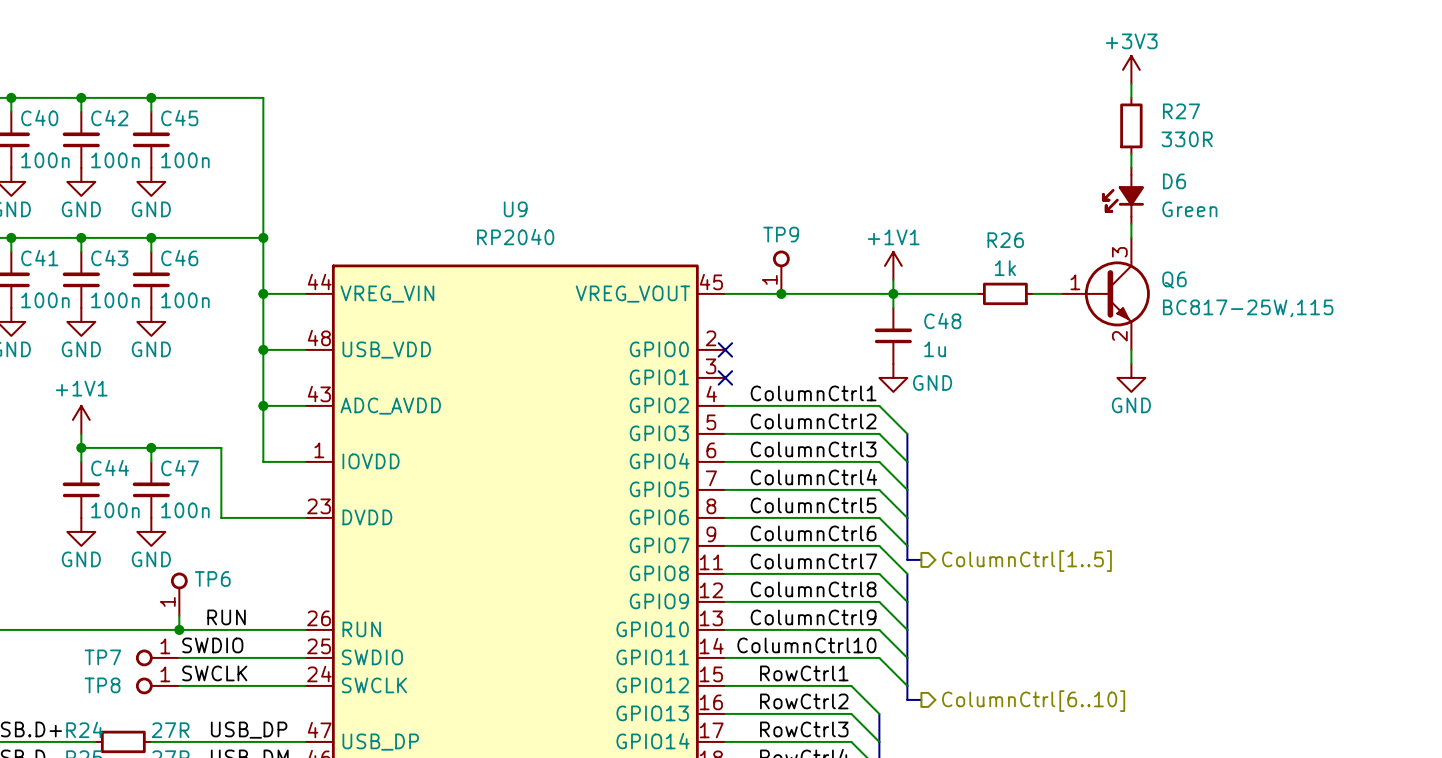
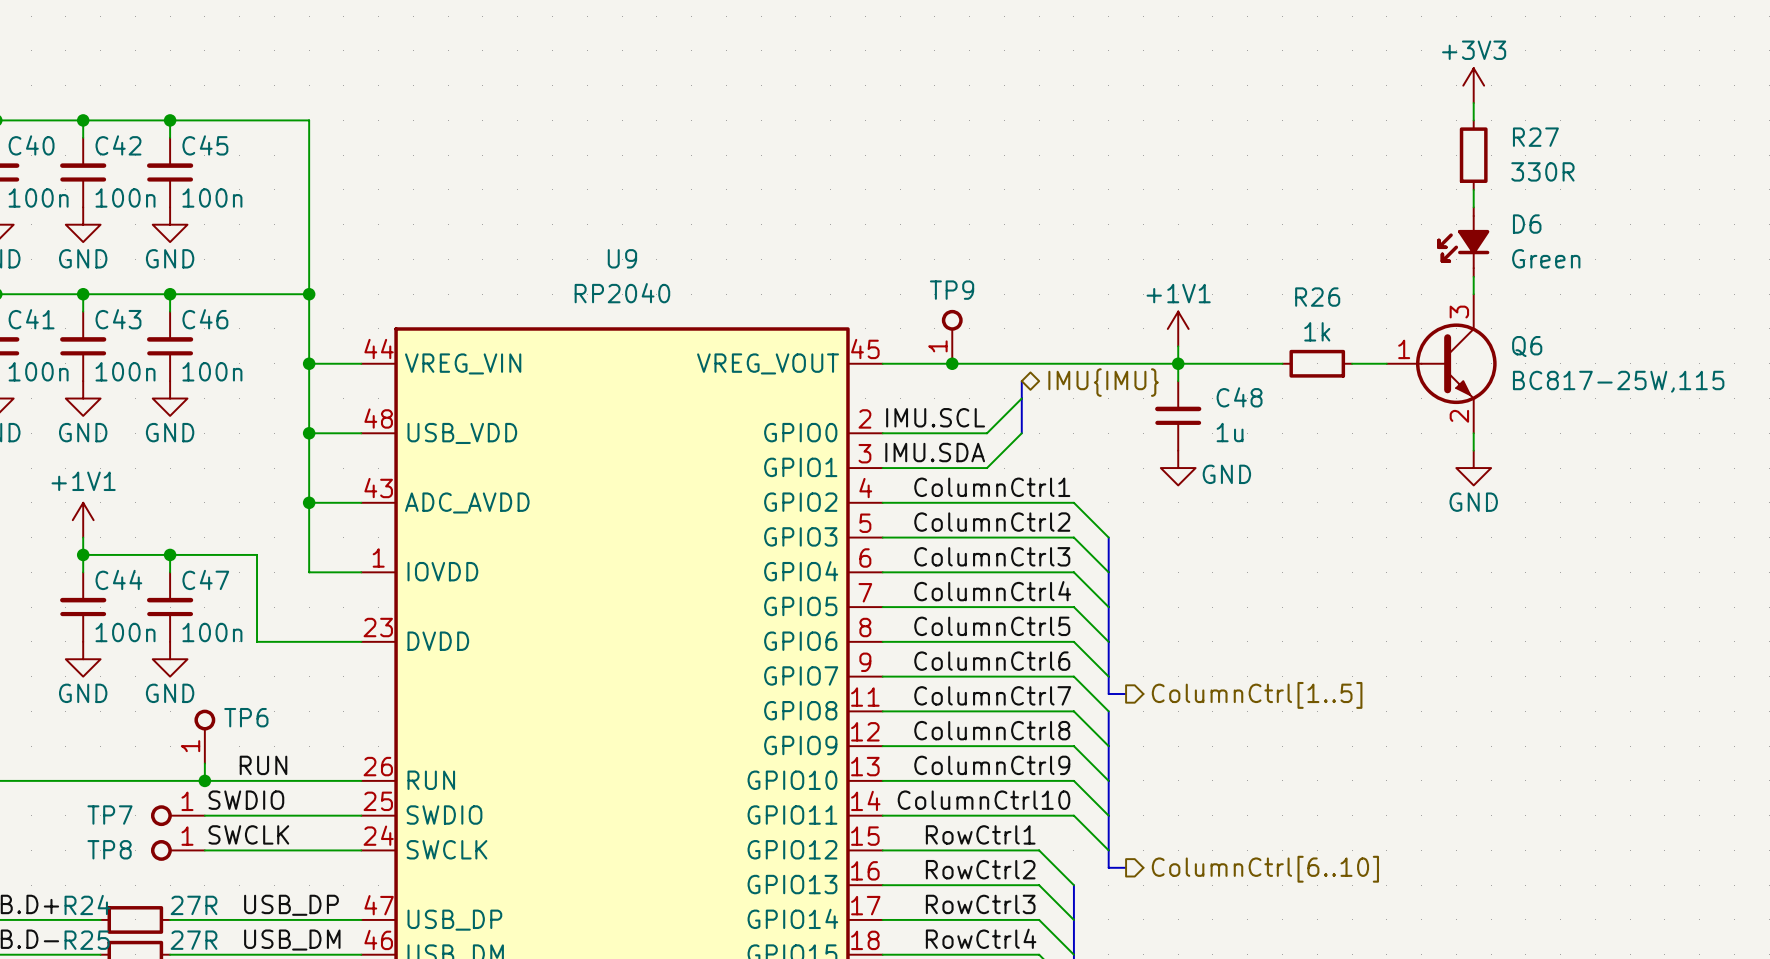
power symbol position: +3V3 (1131, 69) -> +3V3 (1473, 85)
wire: (1131, 83) (1131, 97) -> (1473, 103) (1473, 120)
R27 position: (1131, 125) -> (1473, 155)
wire: (1131, 153) (1131, 167) -> (1473, 189) (1473, 207)
D6 position: (1122, 195) -> (1463, 242)
wire: (1131, 223) (1131, 237) -> (1473, 276) (1473, 294)
power symbol position: +1V1 (893, 265) -> +1V1 (1178, 328)
wire: (893, 279) (893, 307) -> (1178, 346) (1178, 381)
junction: (893, 293) -> none
junction: none -> (1178, 363)
wire: none -> (1195, 363) (1265, 363)
R26 position: (1005, 293) -> (1317, 363)
wire: none -> (1352, 363) (1386, 363)
Q6 position: (1105, 293) -> (1441, 363)
bus: none -> (1021, 381) (1021, 433)
hierarchical label: none -> IMU{IMU} (1103, 382)
wire: none -> (1021, 398) (987, 433) (882, 433)
C48 position: (893, 335) -> (1178, 415)
label: none -> IMU.SCL (935, 417)
no-connect mark: (725, 349) -> none
wire: none -> (1021, 433) (987, 468) (882, 468)
wire: (1131, 349) (1131, 363) -> (1473, 433) (1473, 450)
label: none -> IMU.SDA (935, 452)
no-connect mark: (725, 377) -> none
power symbol position: GND (893, 377) -> GND (1178, 468)
power symbol position: GND (1131, 377) -> GND (1473, 468)

